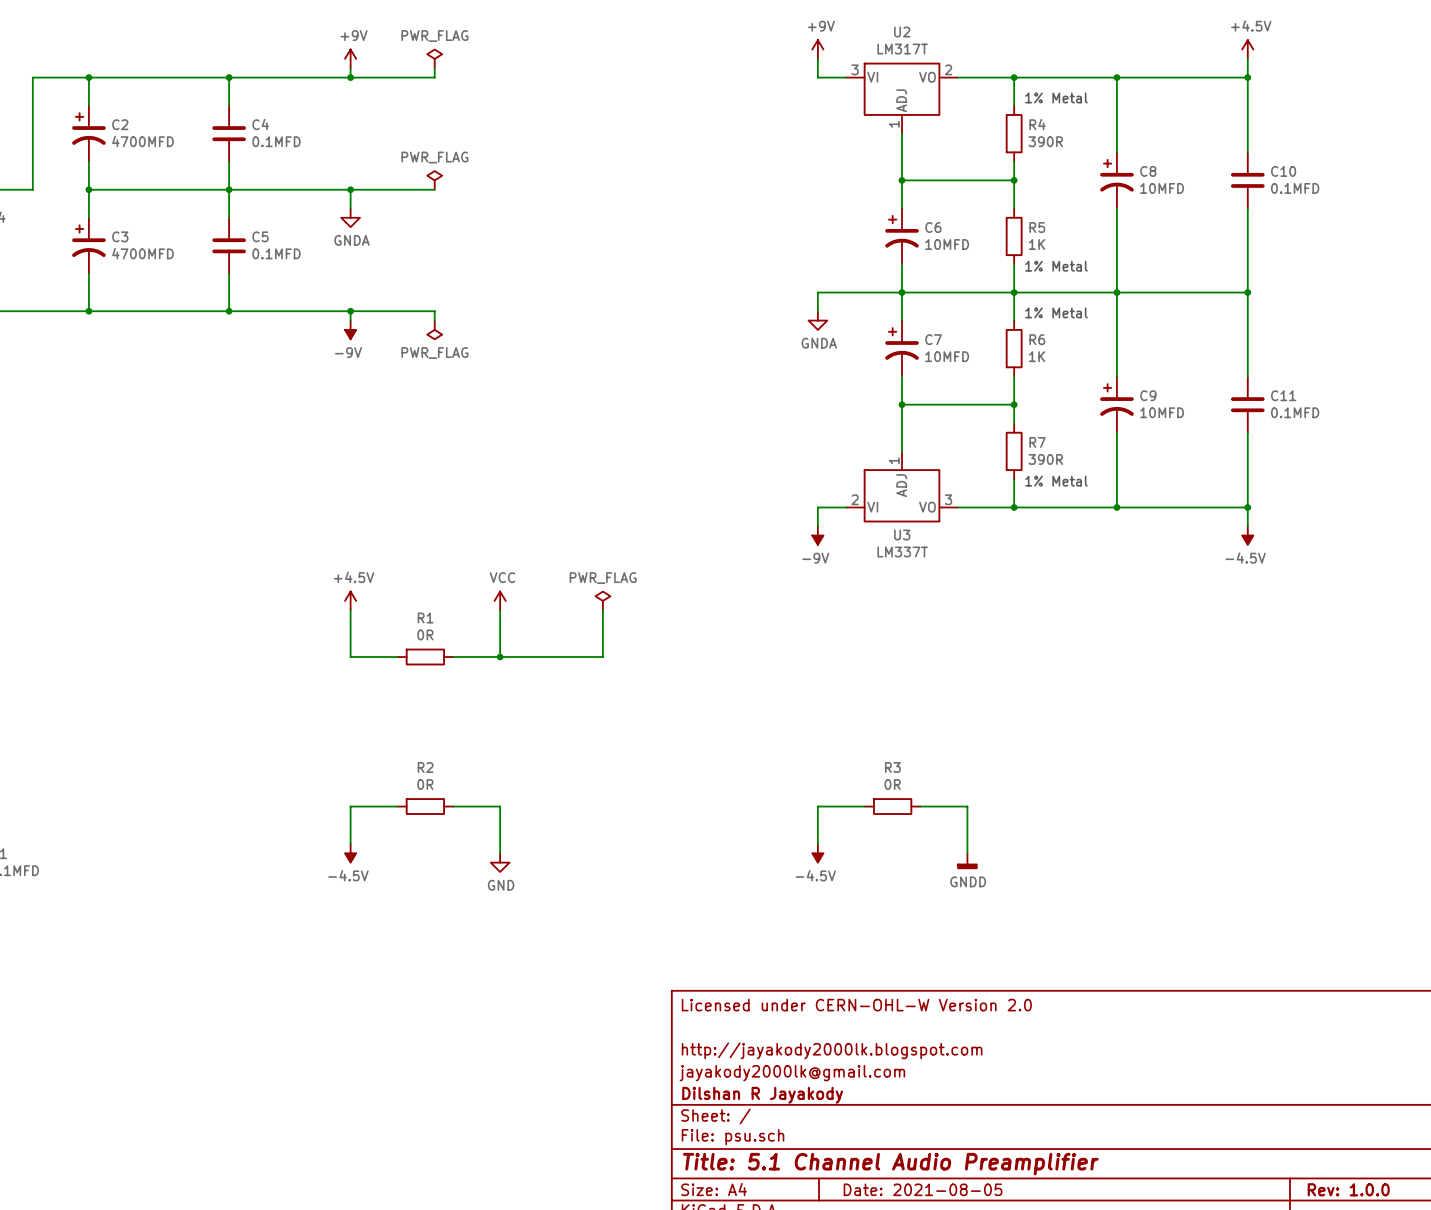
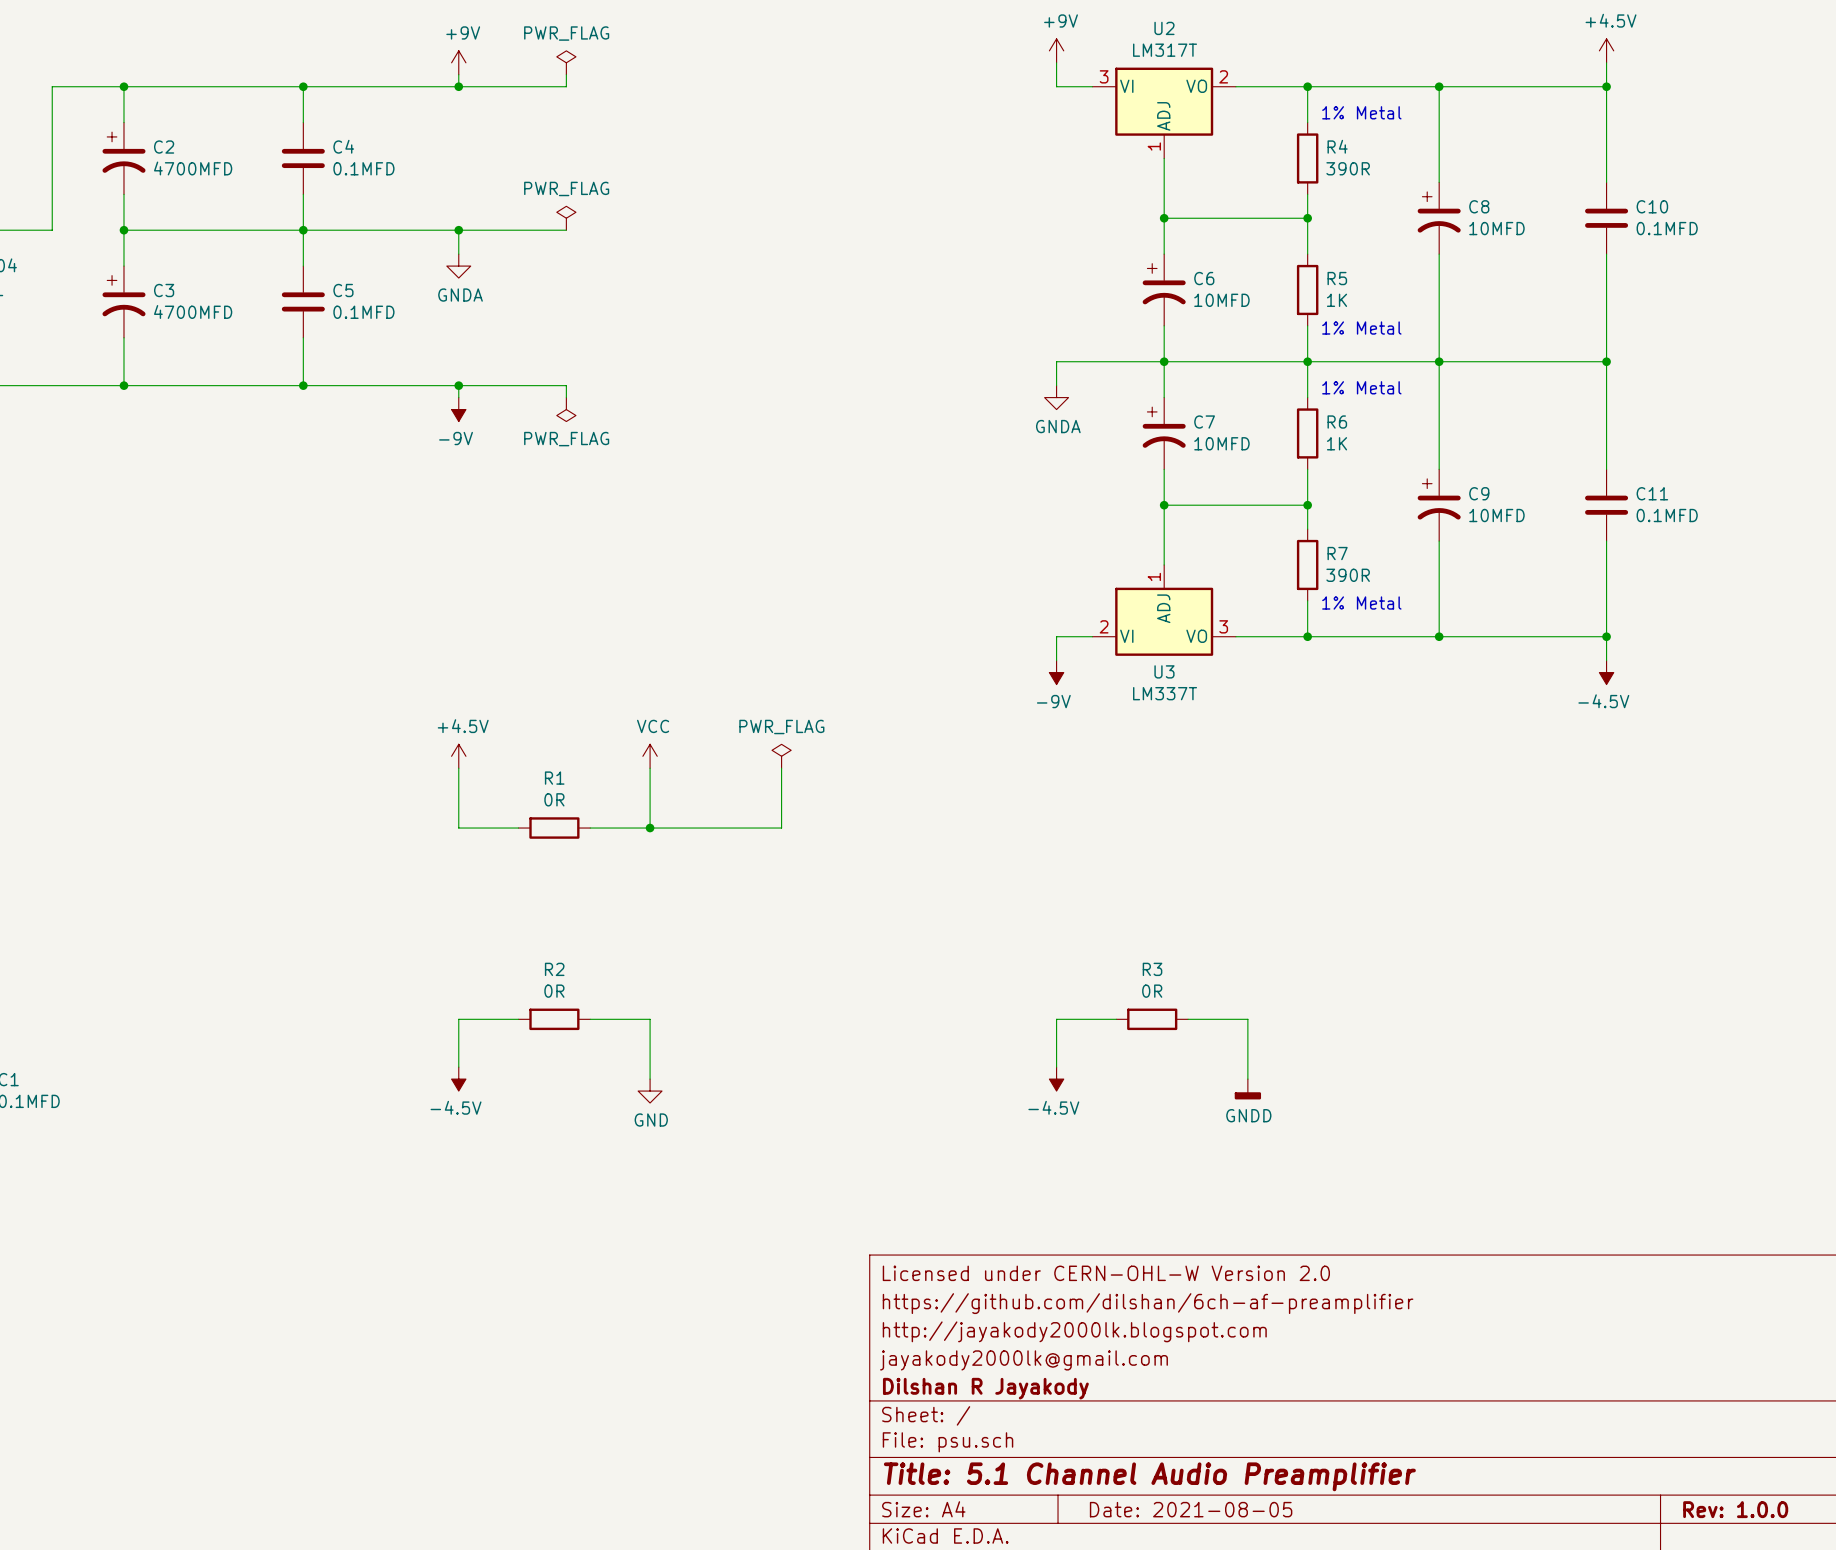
title block: none -> https://github.com/dilshan/6ch-af-preamplifier (1148, 1303)

